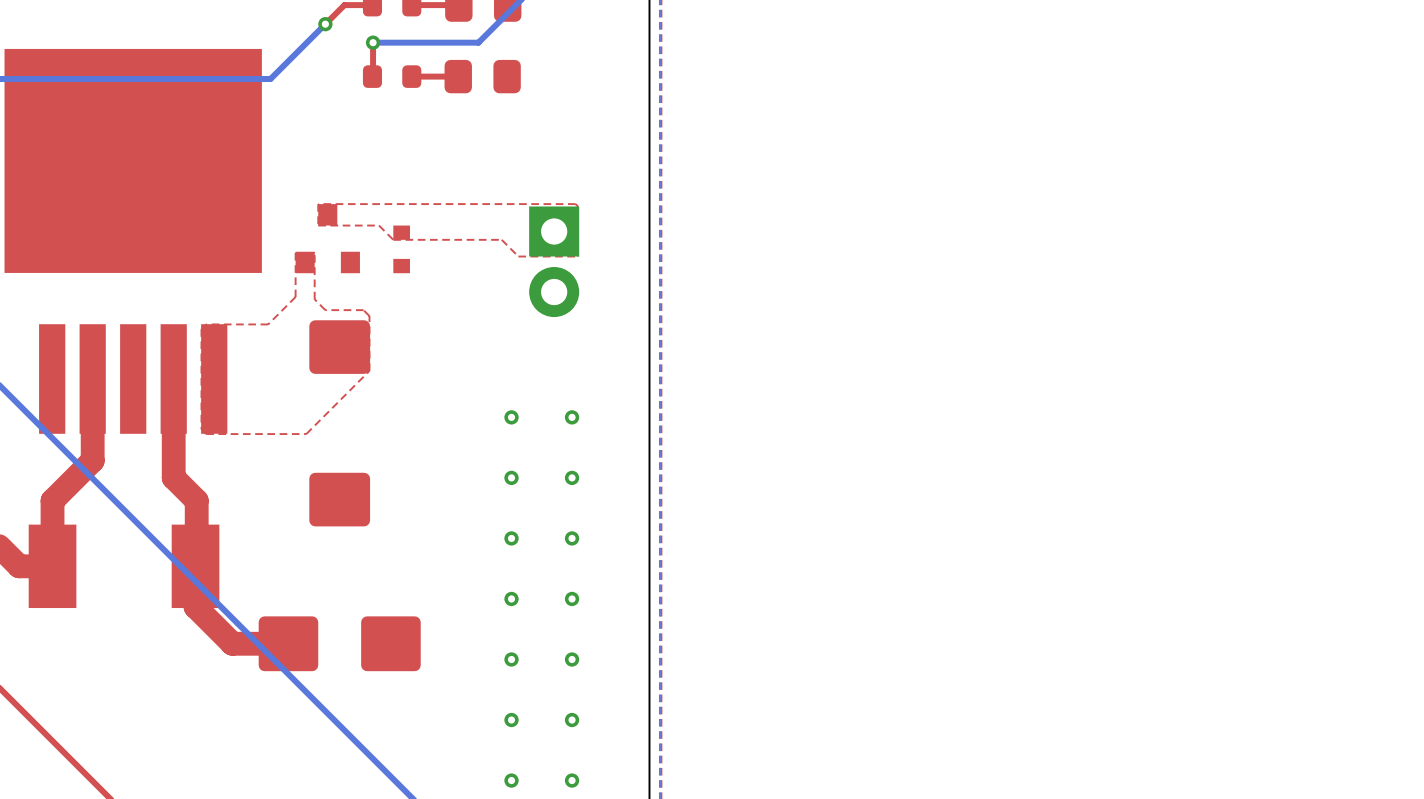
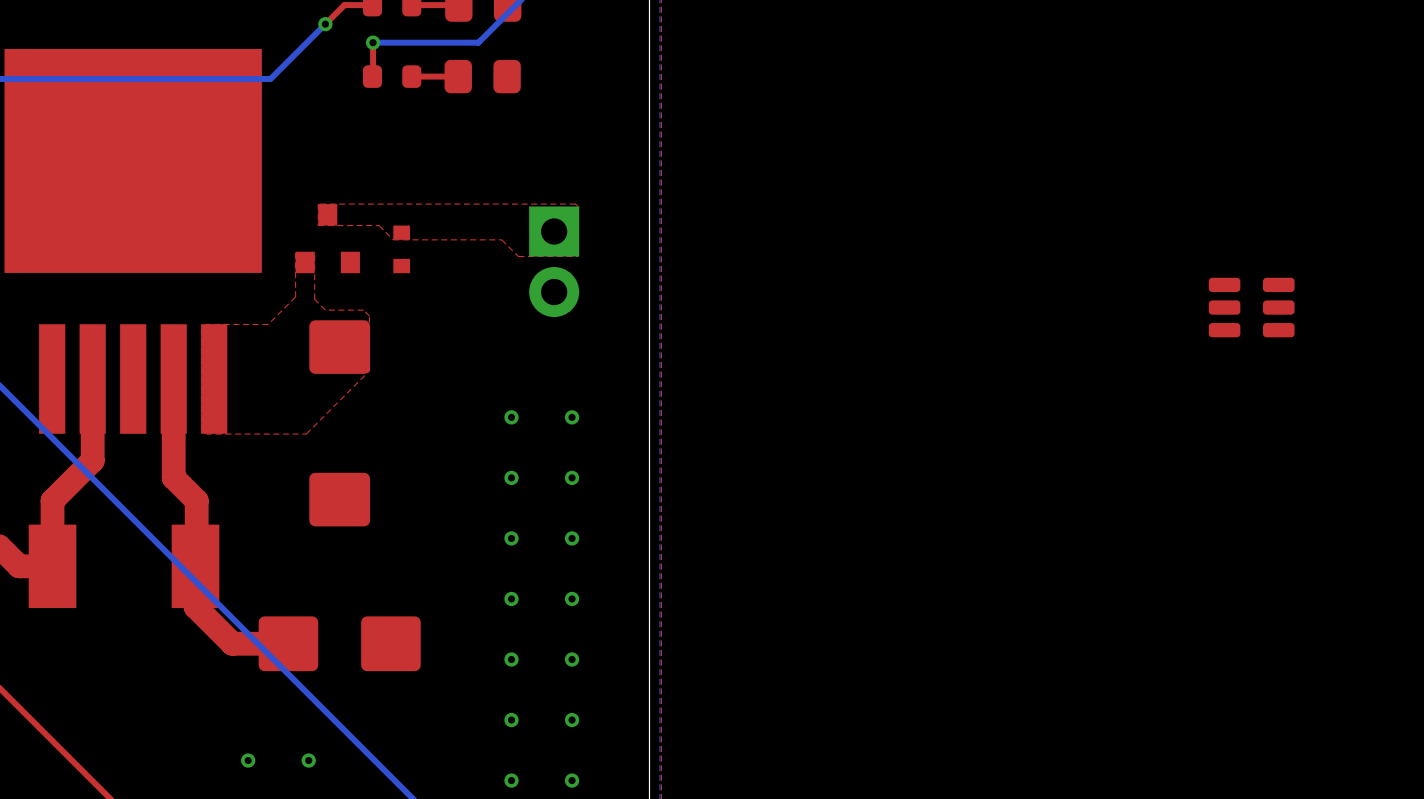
part: none -> (1251, 307)
via: none -> (248, 760)
via: none -> (308, 760)

